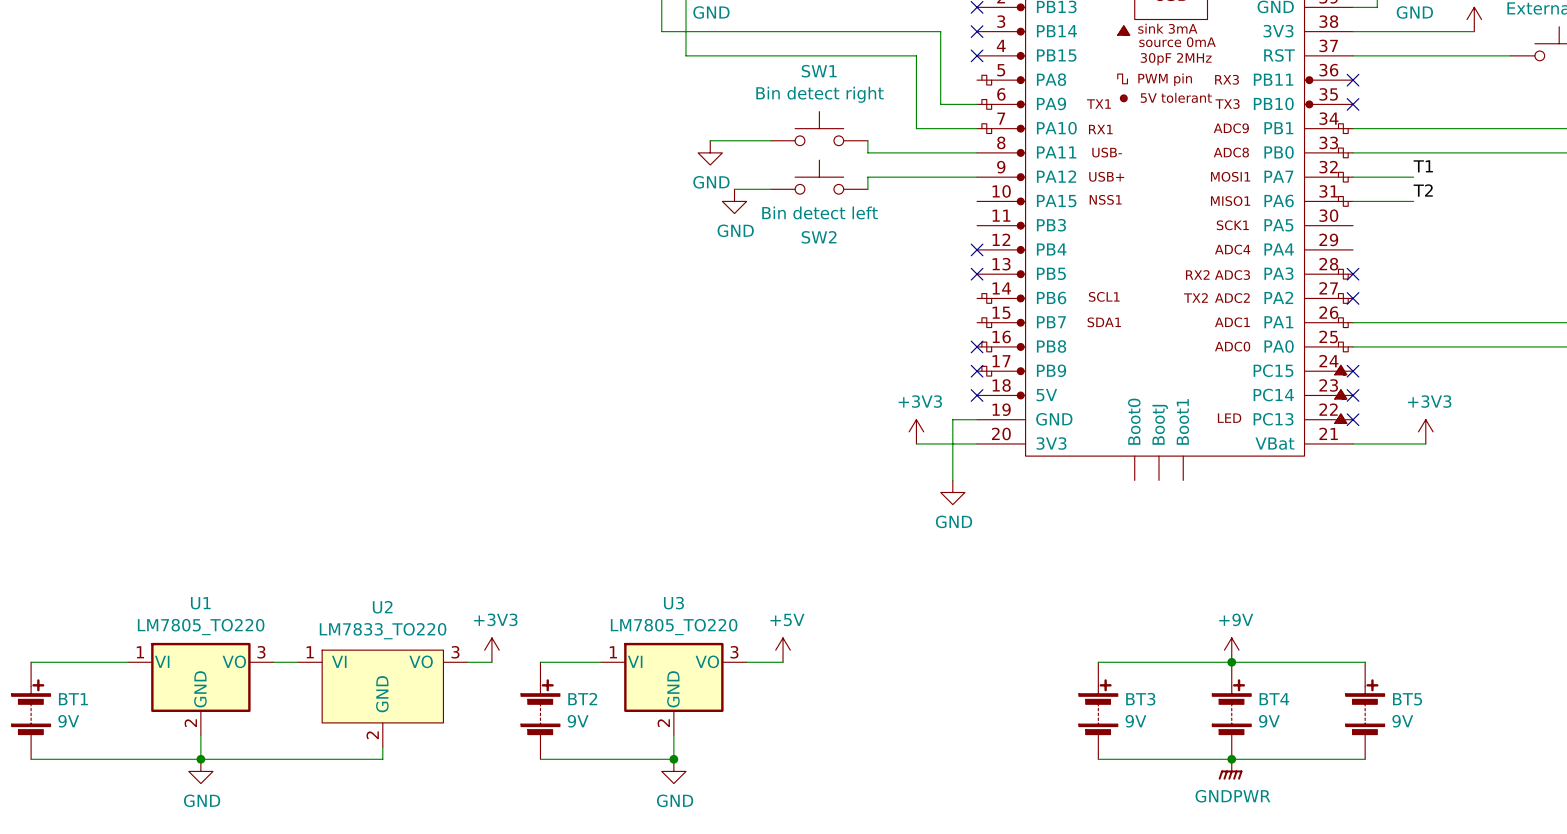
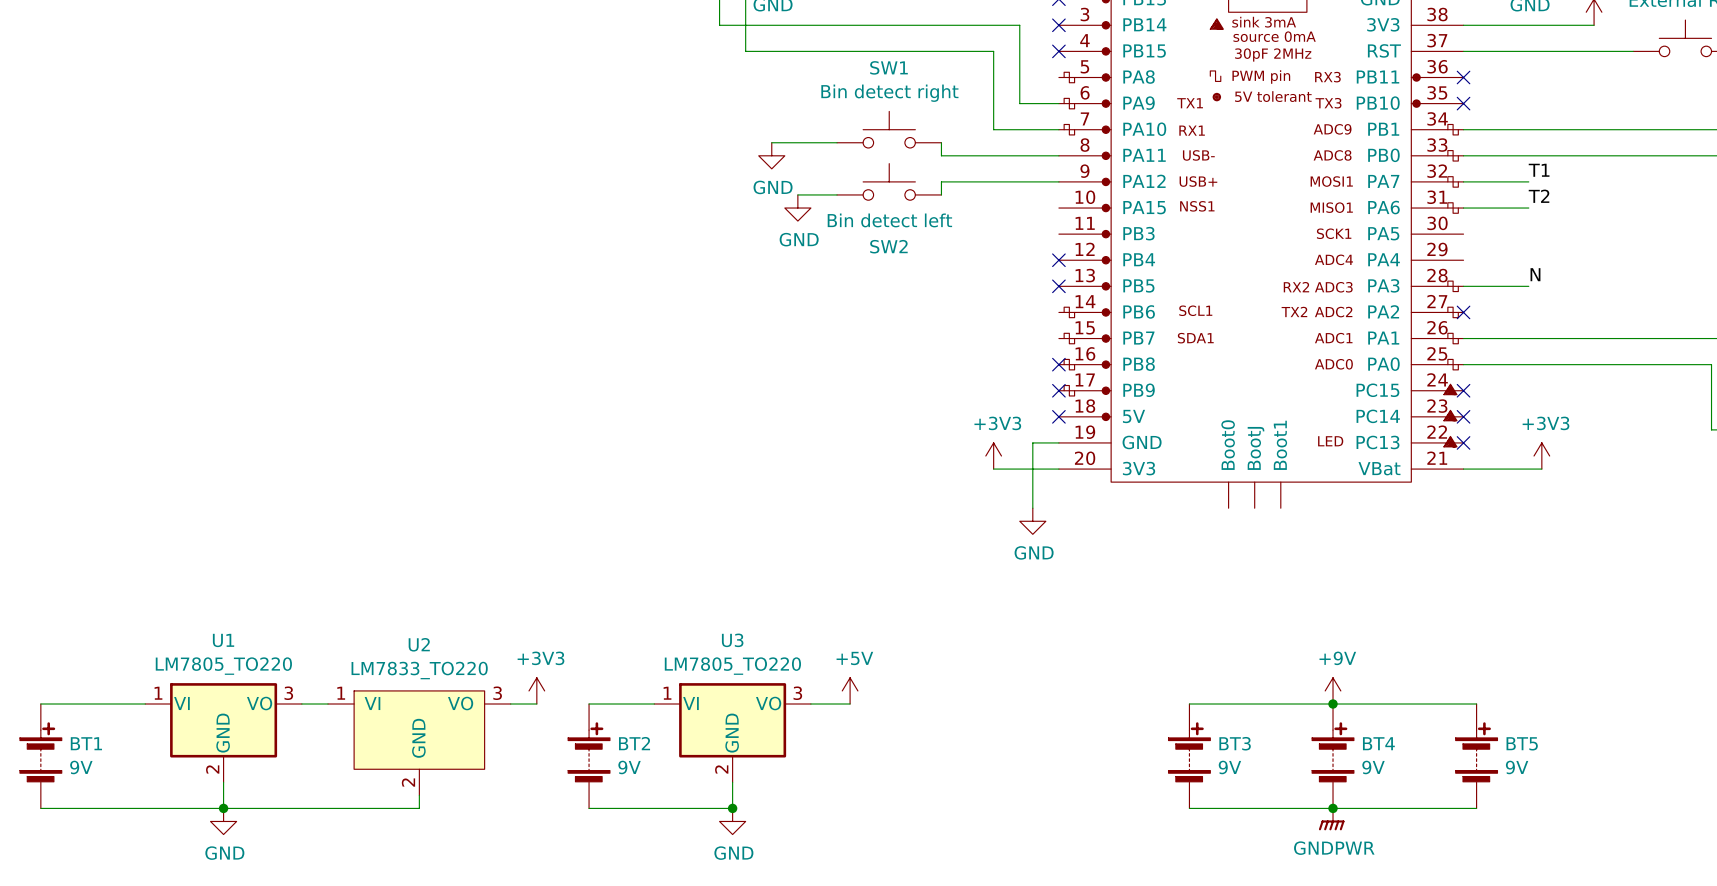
label: none -> N (1535, 274)
wire: none -> (1463, 286) (1528, 286)
no-connect mark: (1353, 274) -> none

